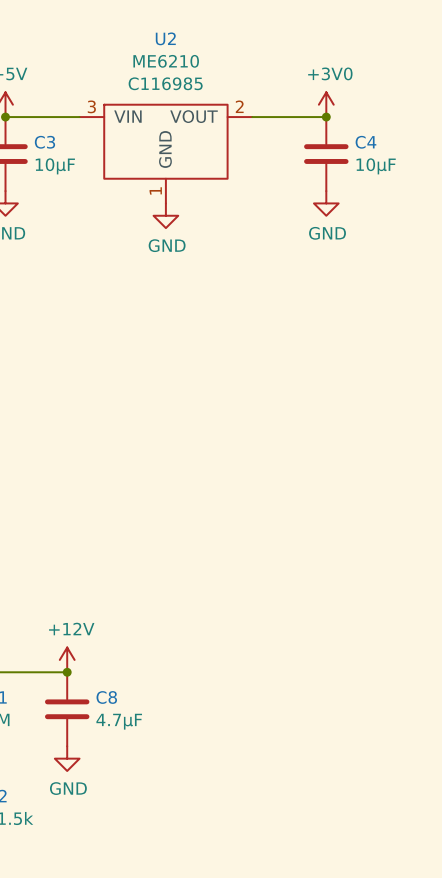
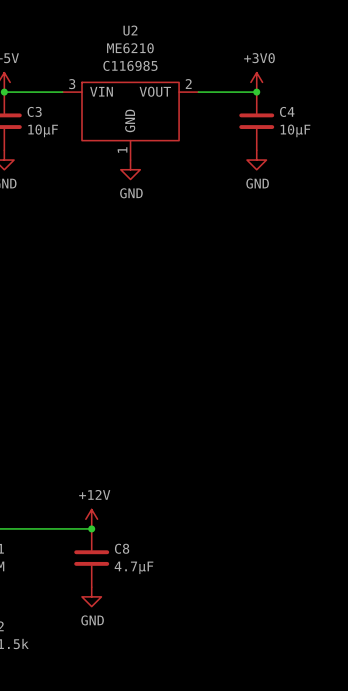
power symbol position: +12V (67, 659) -> +12V (91, 519)
wire: none -> (52, 528) (91, 528)
junction: (67, 672) -> none
junction: none -> (91, 528)
C8 position: (67, 709) -> (91, 558)
power symbol position: GND (67, 758) -> GND (91, 596)

